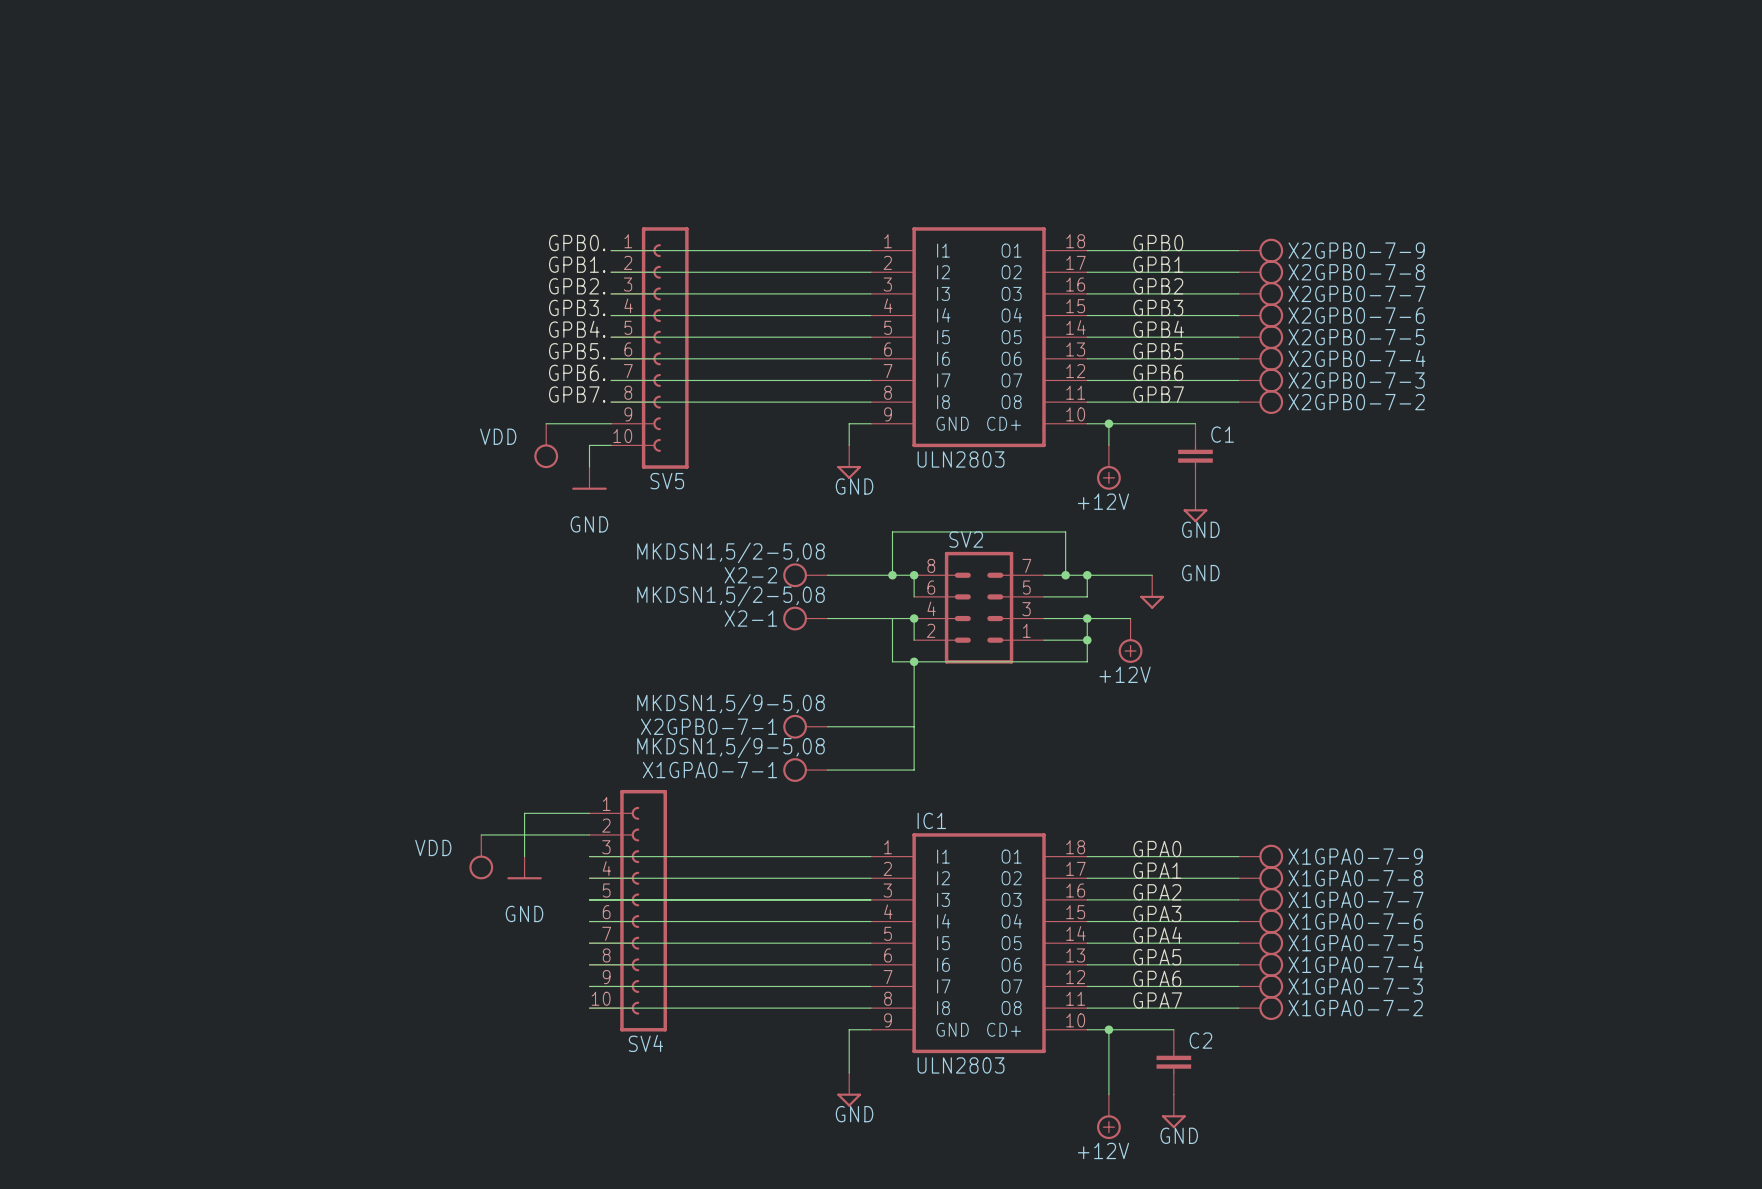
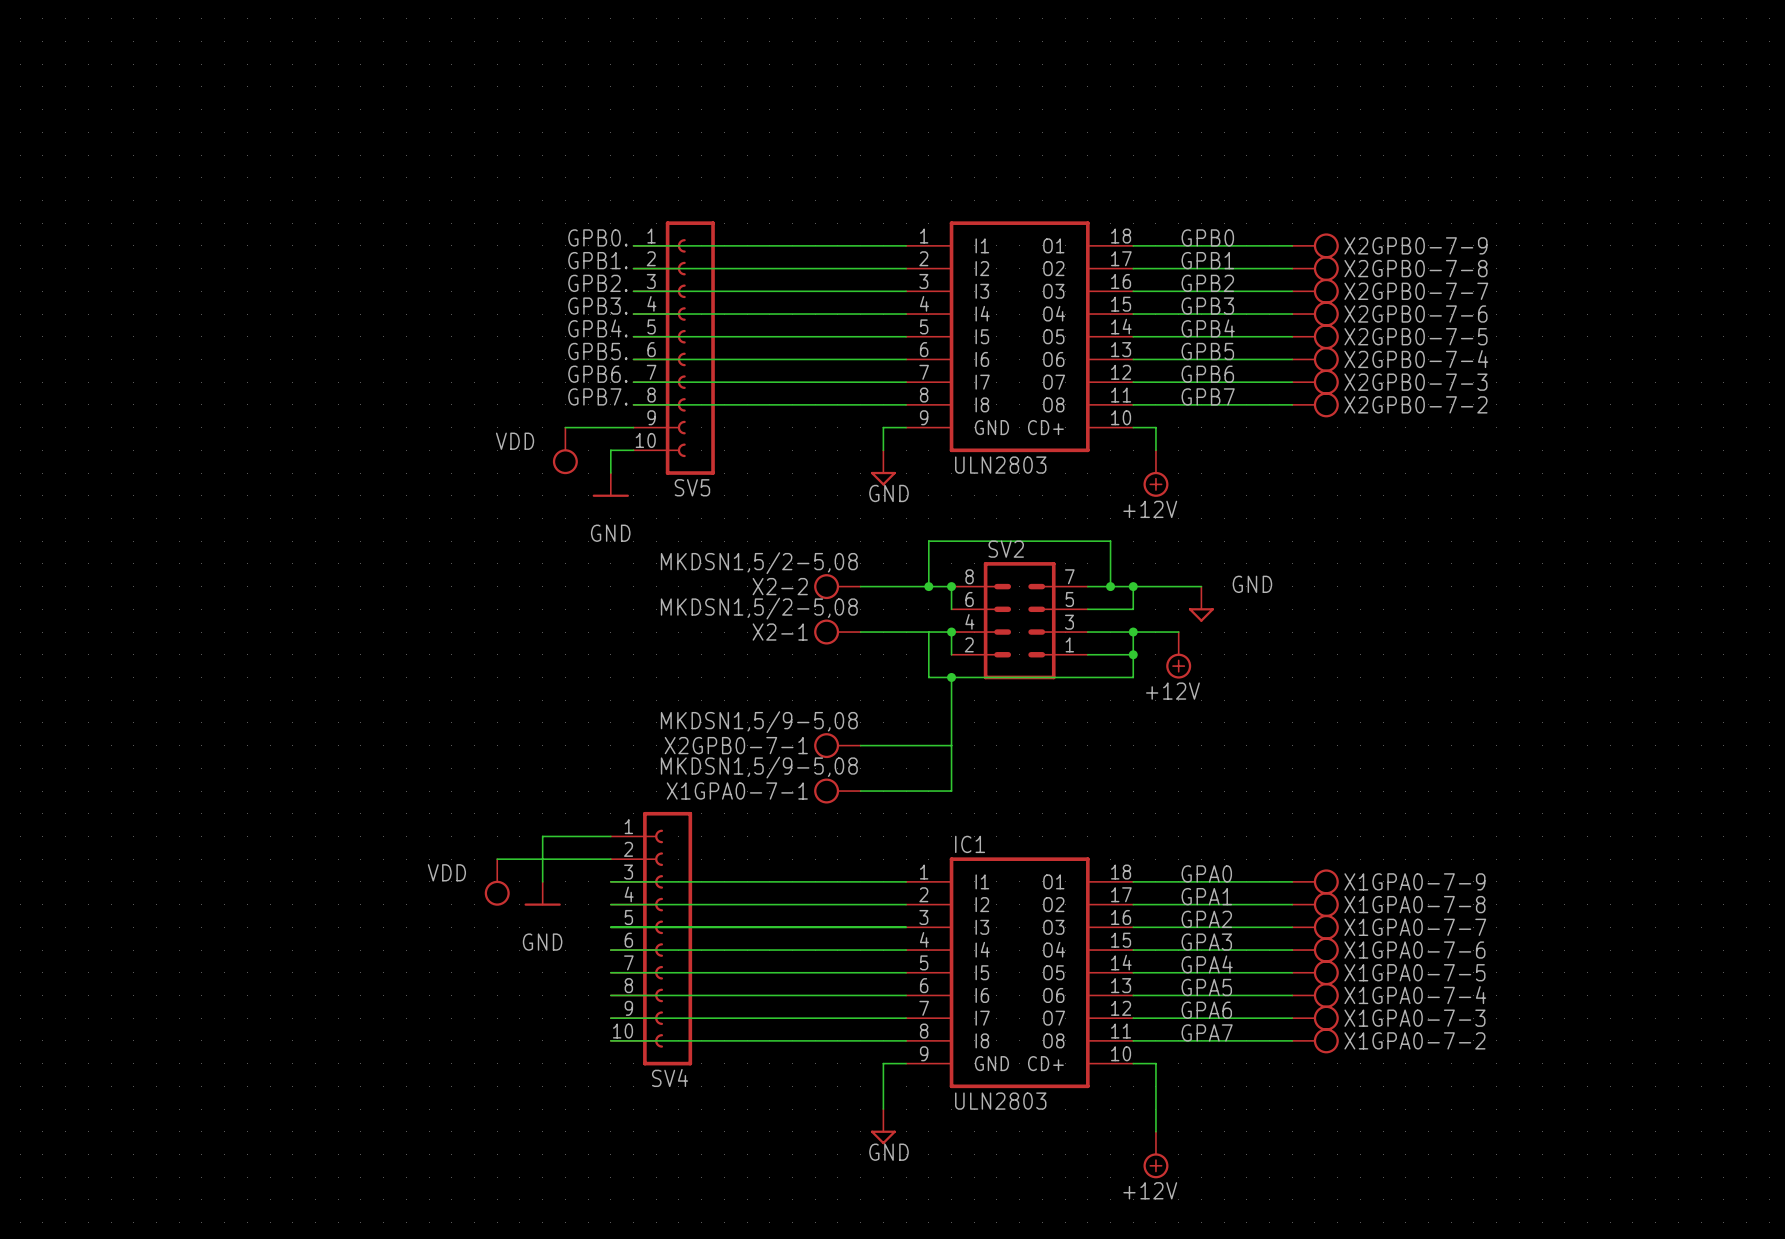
wire: (1108, 423) (1195, 423) -> none
junction: (1108, 423) -> none
C1: (1195, 456) -> none
power symbol: GND (1195, 505) -> none
wire: (1108, 1029) (1173, 1029) -> none
junction: (1108, 1029) -> none
C2: (1173, 1062) -> none
power symbol: GND (1173, 1111) -> none

